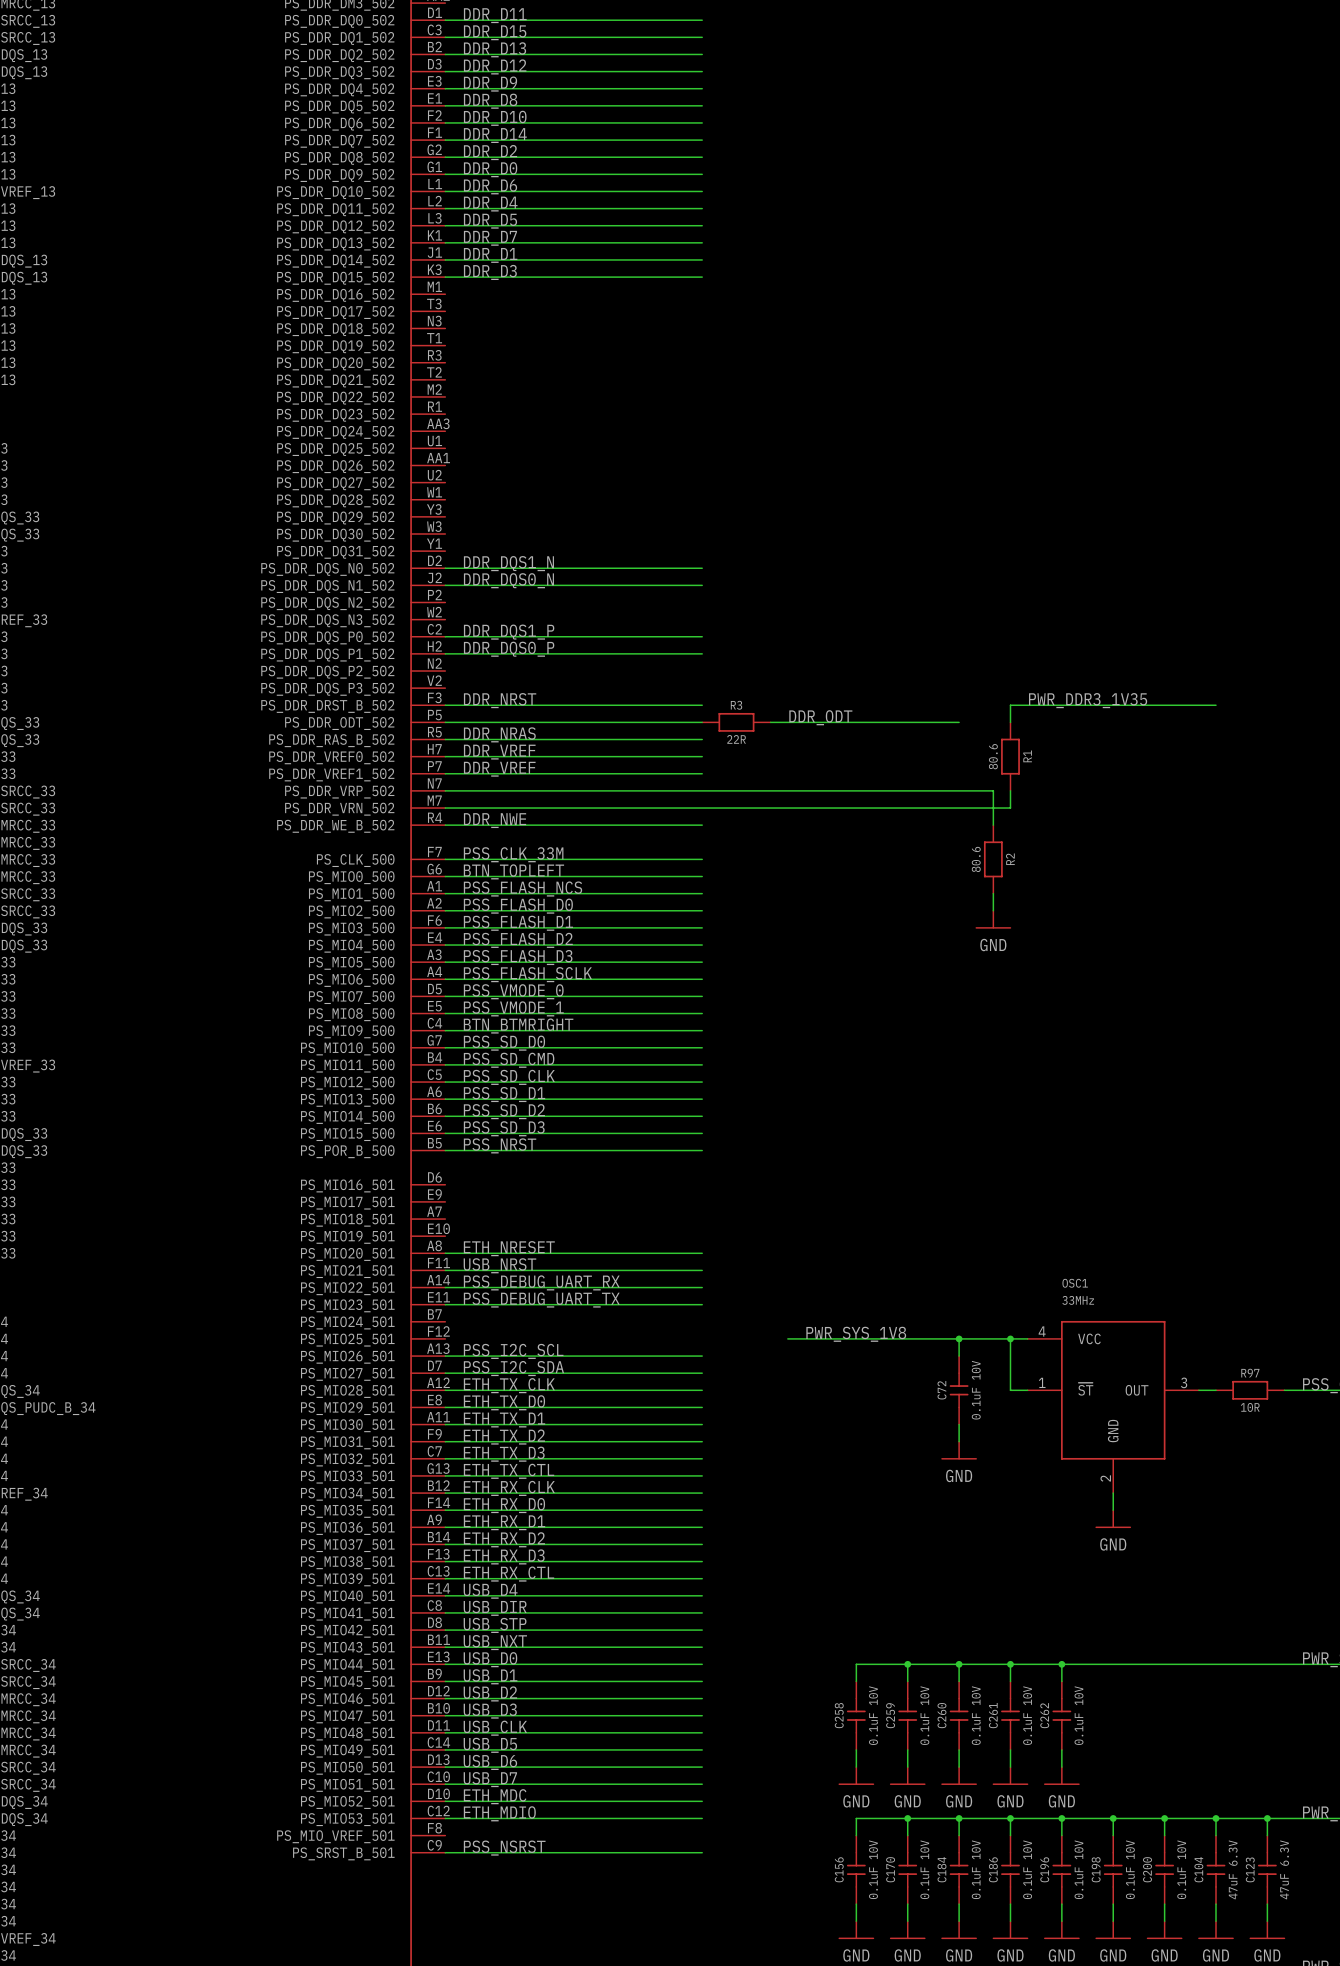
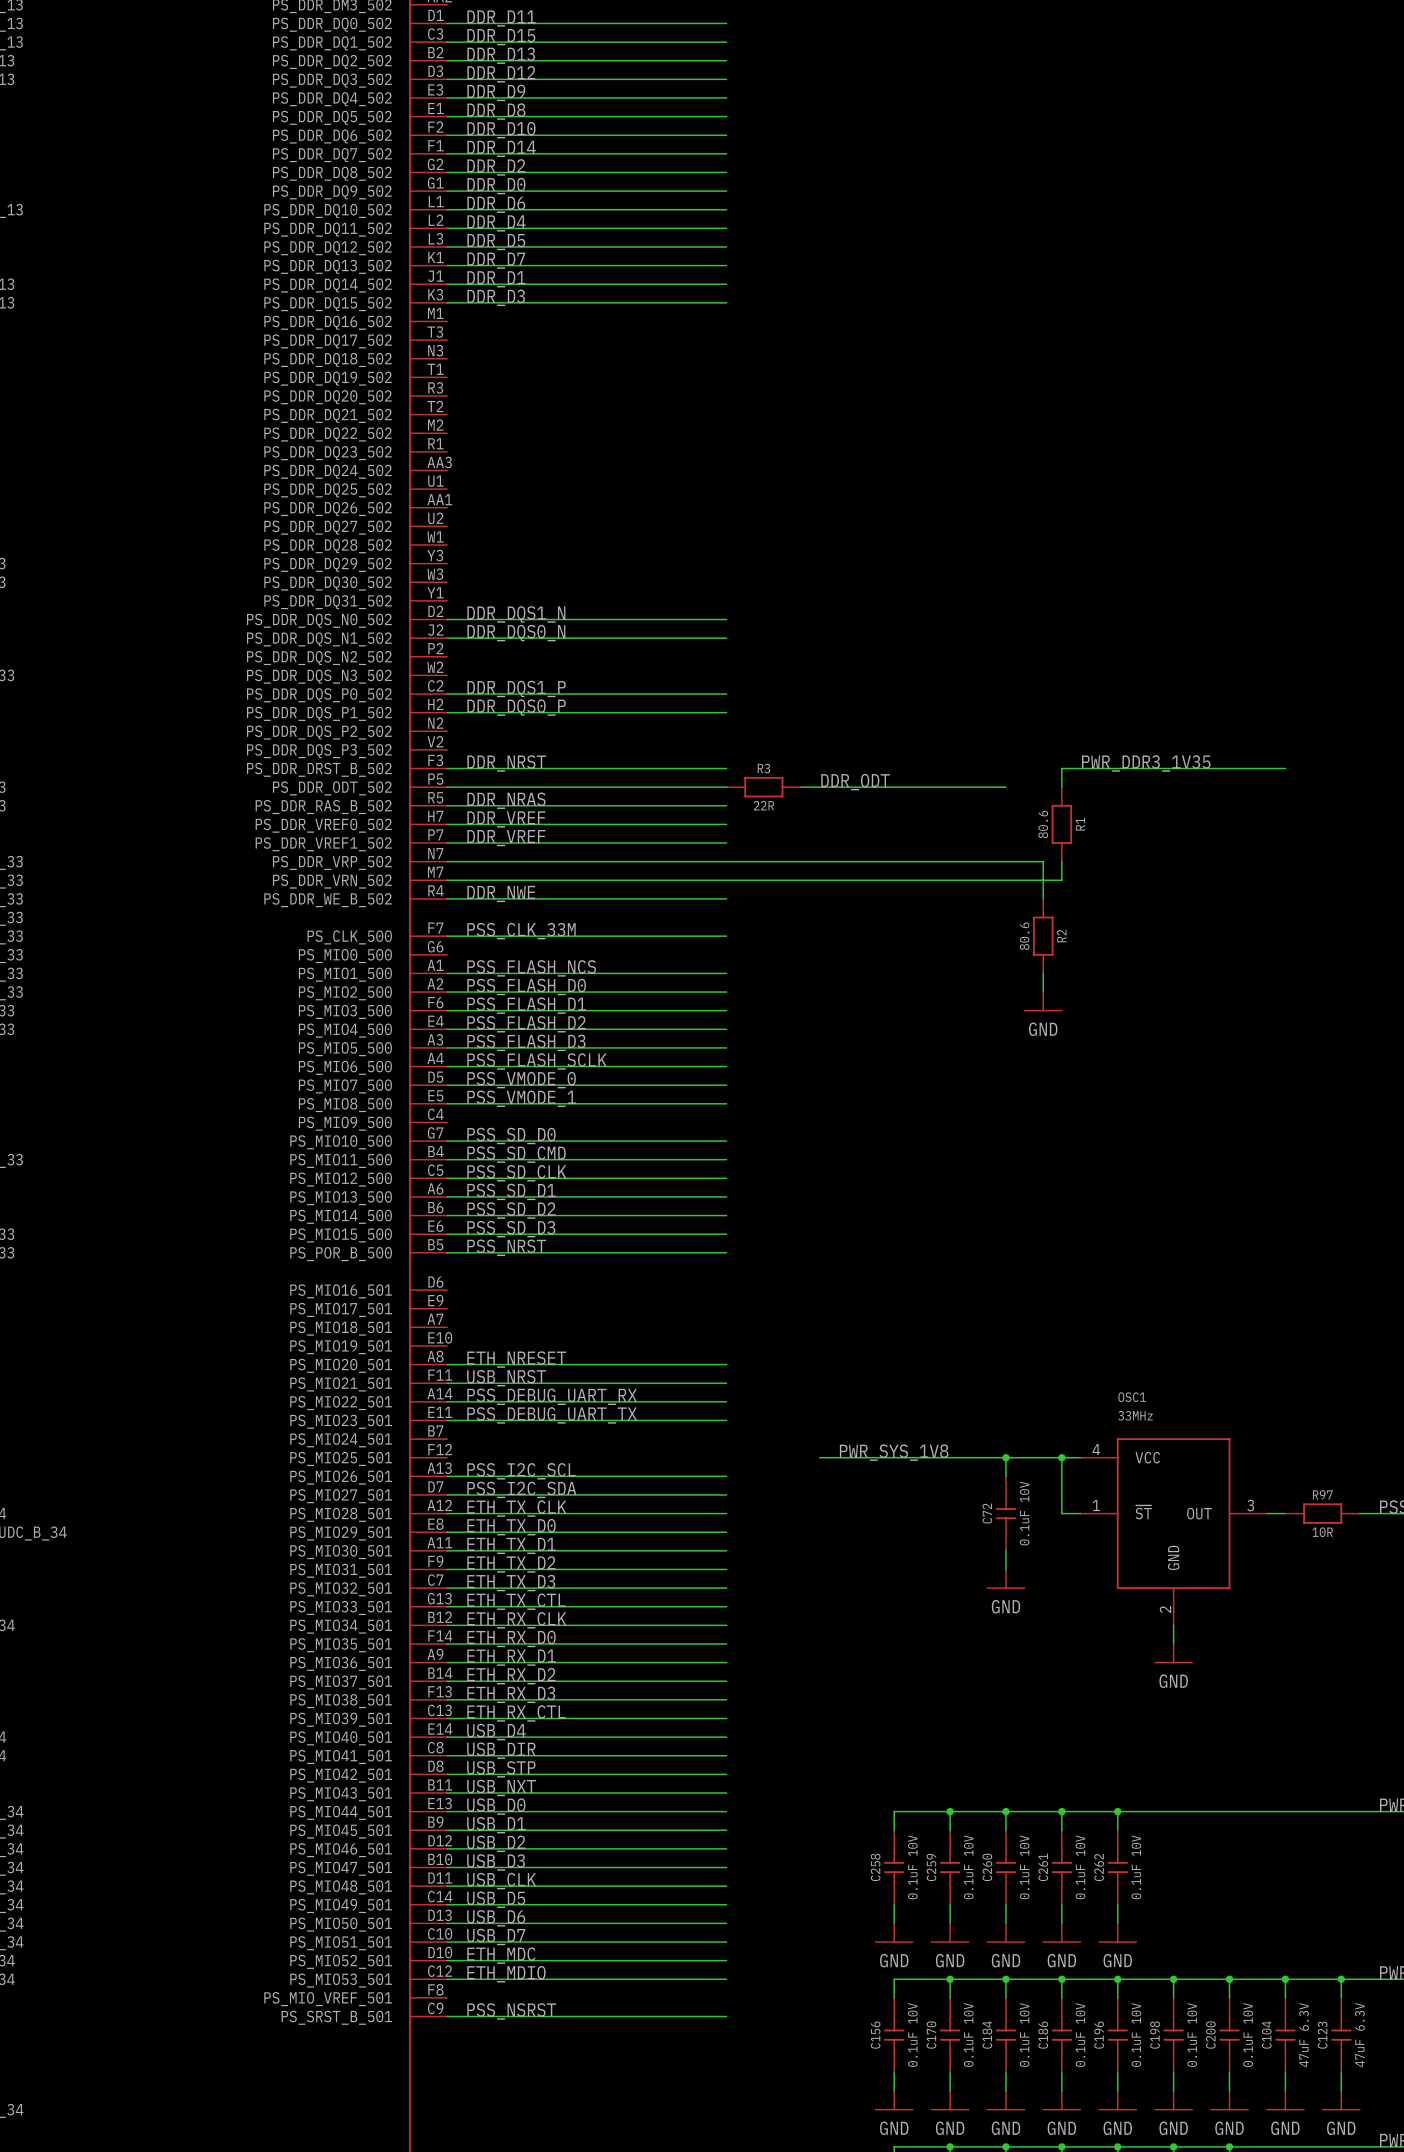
label: BTN_TOPLEFT (513, 871) -> none
wire: (445, 876) (702, 876) -> none
label: BTN_BTMRIGHT (518, 1026) -> none
wire: (445, 1030) (702, 1030) -> none

